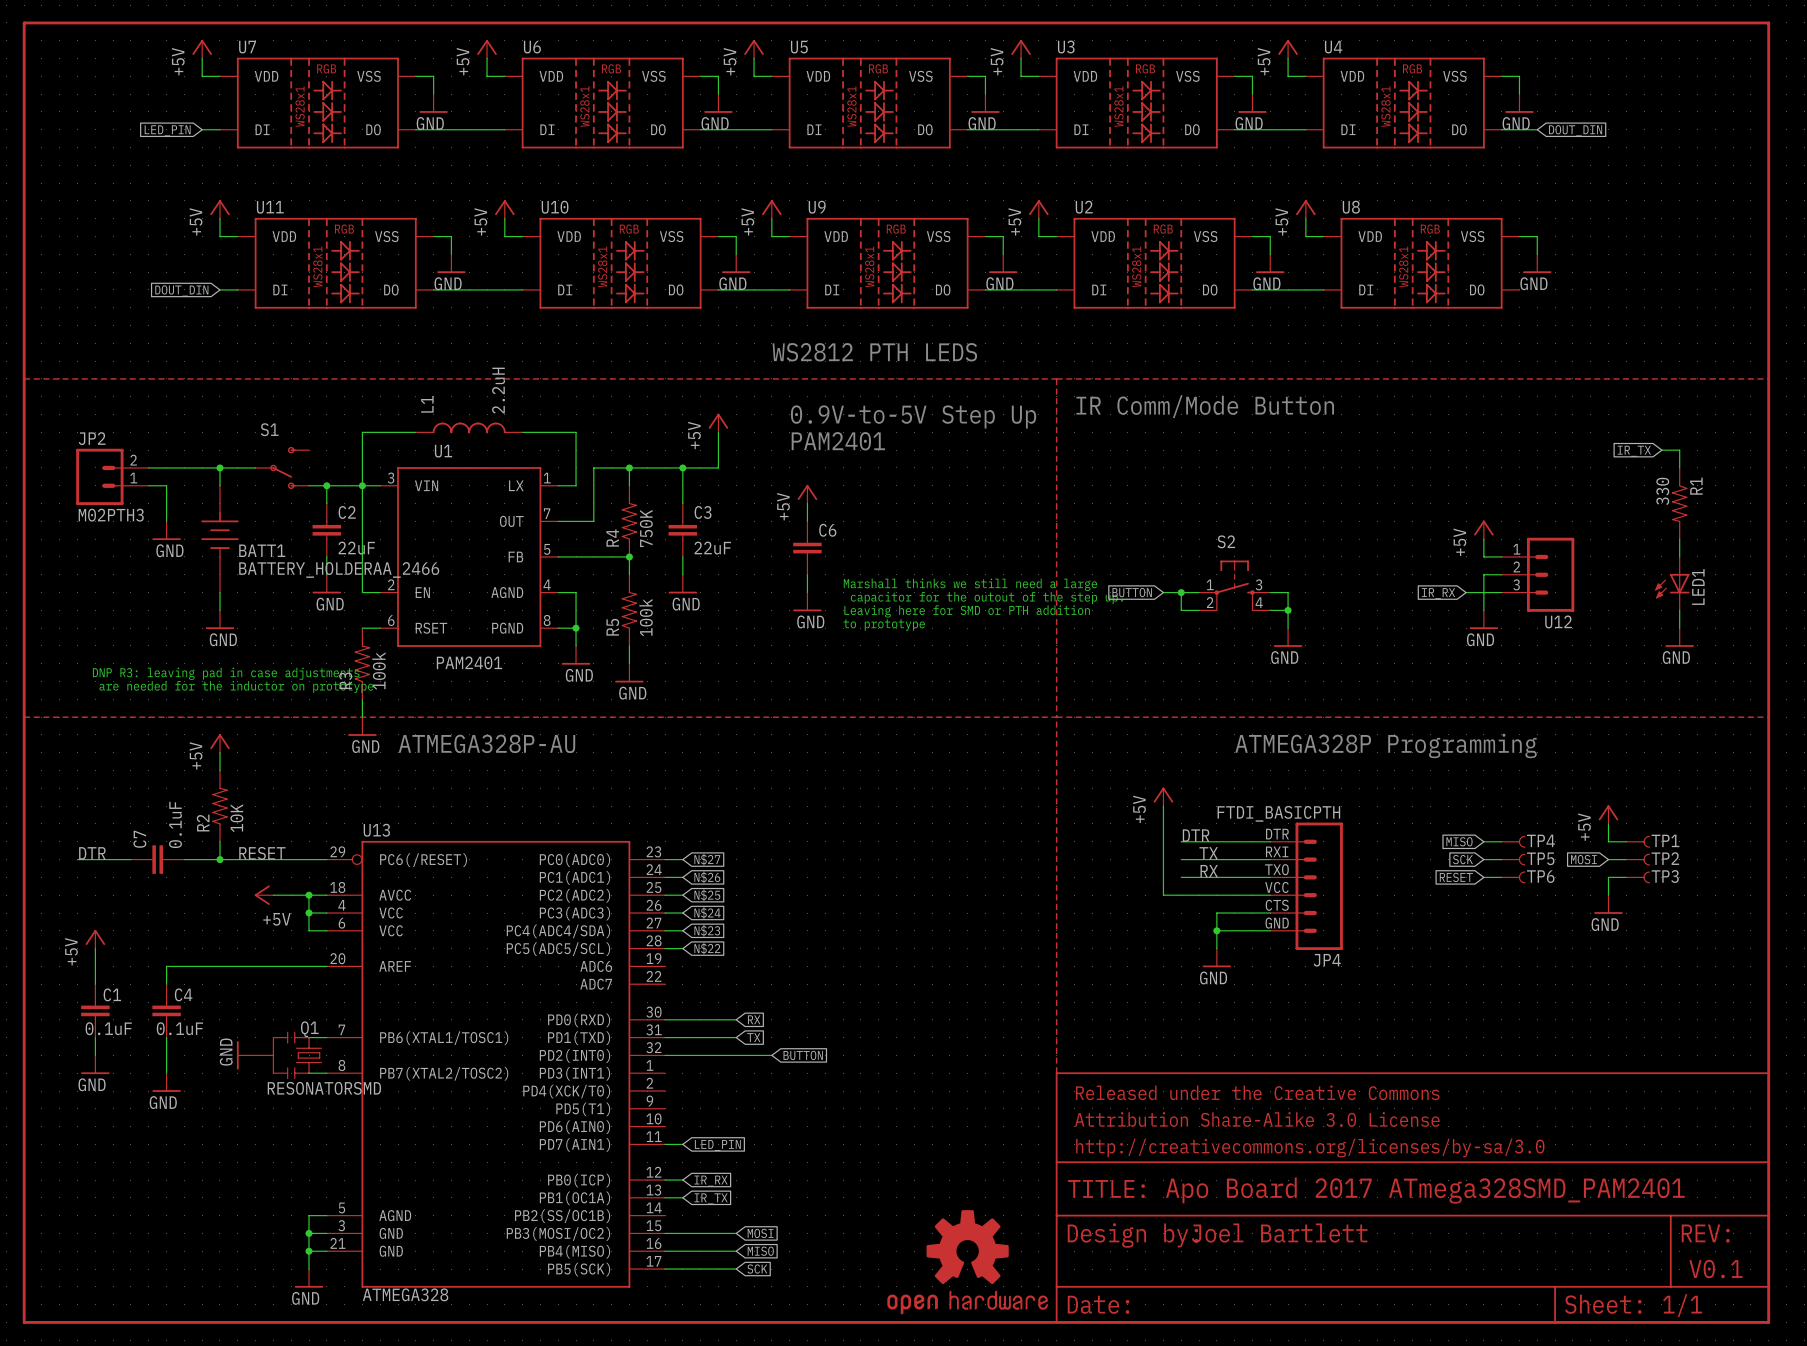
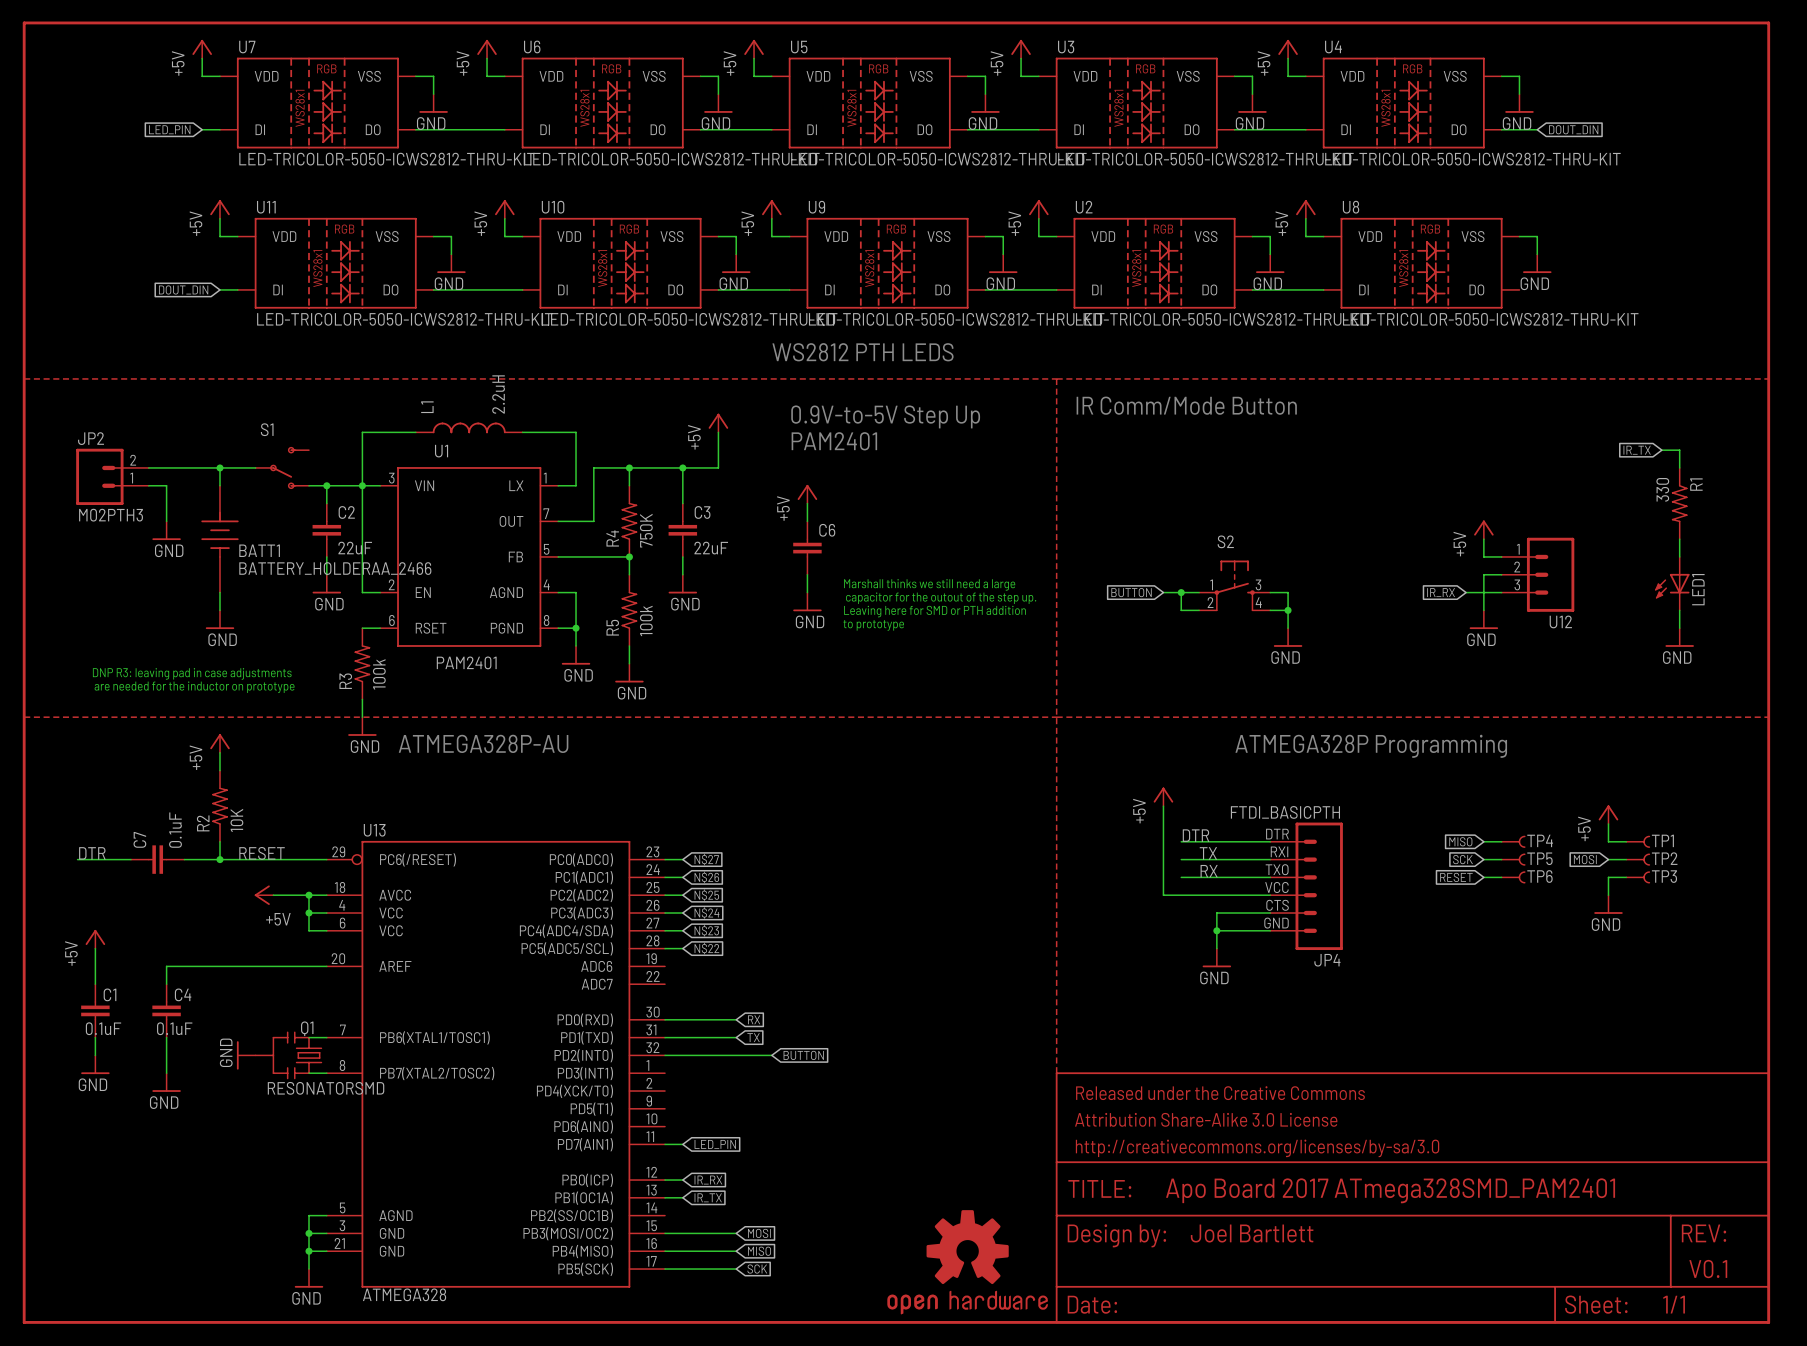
U7 value: none -> LED-TRICOLOR-5050-ICWS2812-THRU-KIT (387, 159)
U6 value: none -> LED-TRICOLOR-5050-ICWS2812-THRU-KIT (671, 159)
U5 value: none -> LED-TRICOLOR-5050-ICWS2812-THRU-KIT (938, 159)
U3 value: none -> LED-TRICOLOR-5050-ICWS2812-THRU-KIT (1205, 159)
U4 value: none -> LED-TRICOLOR-5050-ICWS2812-THRU-KIT (1472, 159)
U11 value: none -> LED-TRICOLOR-5050-ICWS2812-THRU-KIT (404, 319)
U10 value: none -> LED-TRICOLOR-5050-ICWS2812-THRU-KIT (689, 319)
U9 value: none -> LED-TRICOLOR-5050-ICWS2812-THRU-KIT (956, 319)
U2 value: none -> LED-TRICOLOR-5050-ICWS2812-THRU-KIT (1223, 319)
U8 value: none -> LED-TRICOLOR-5050-ICWS2812-THRU-KIT (1490, 319)

